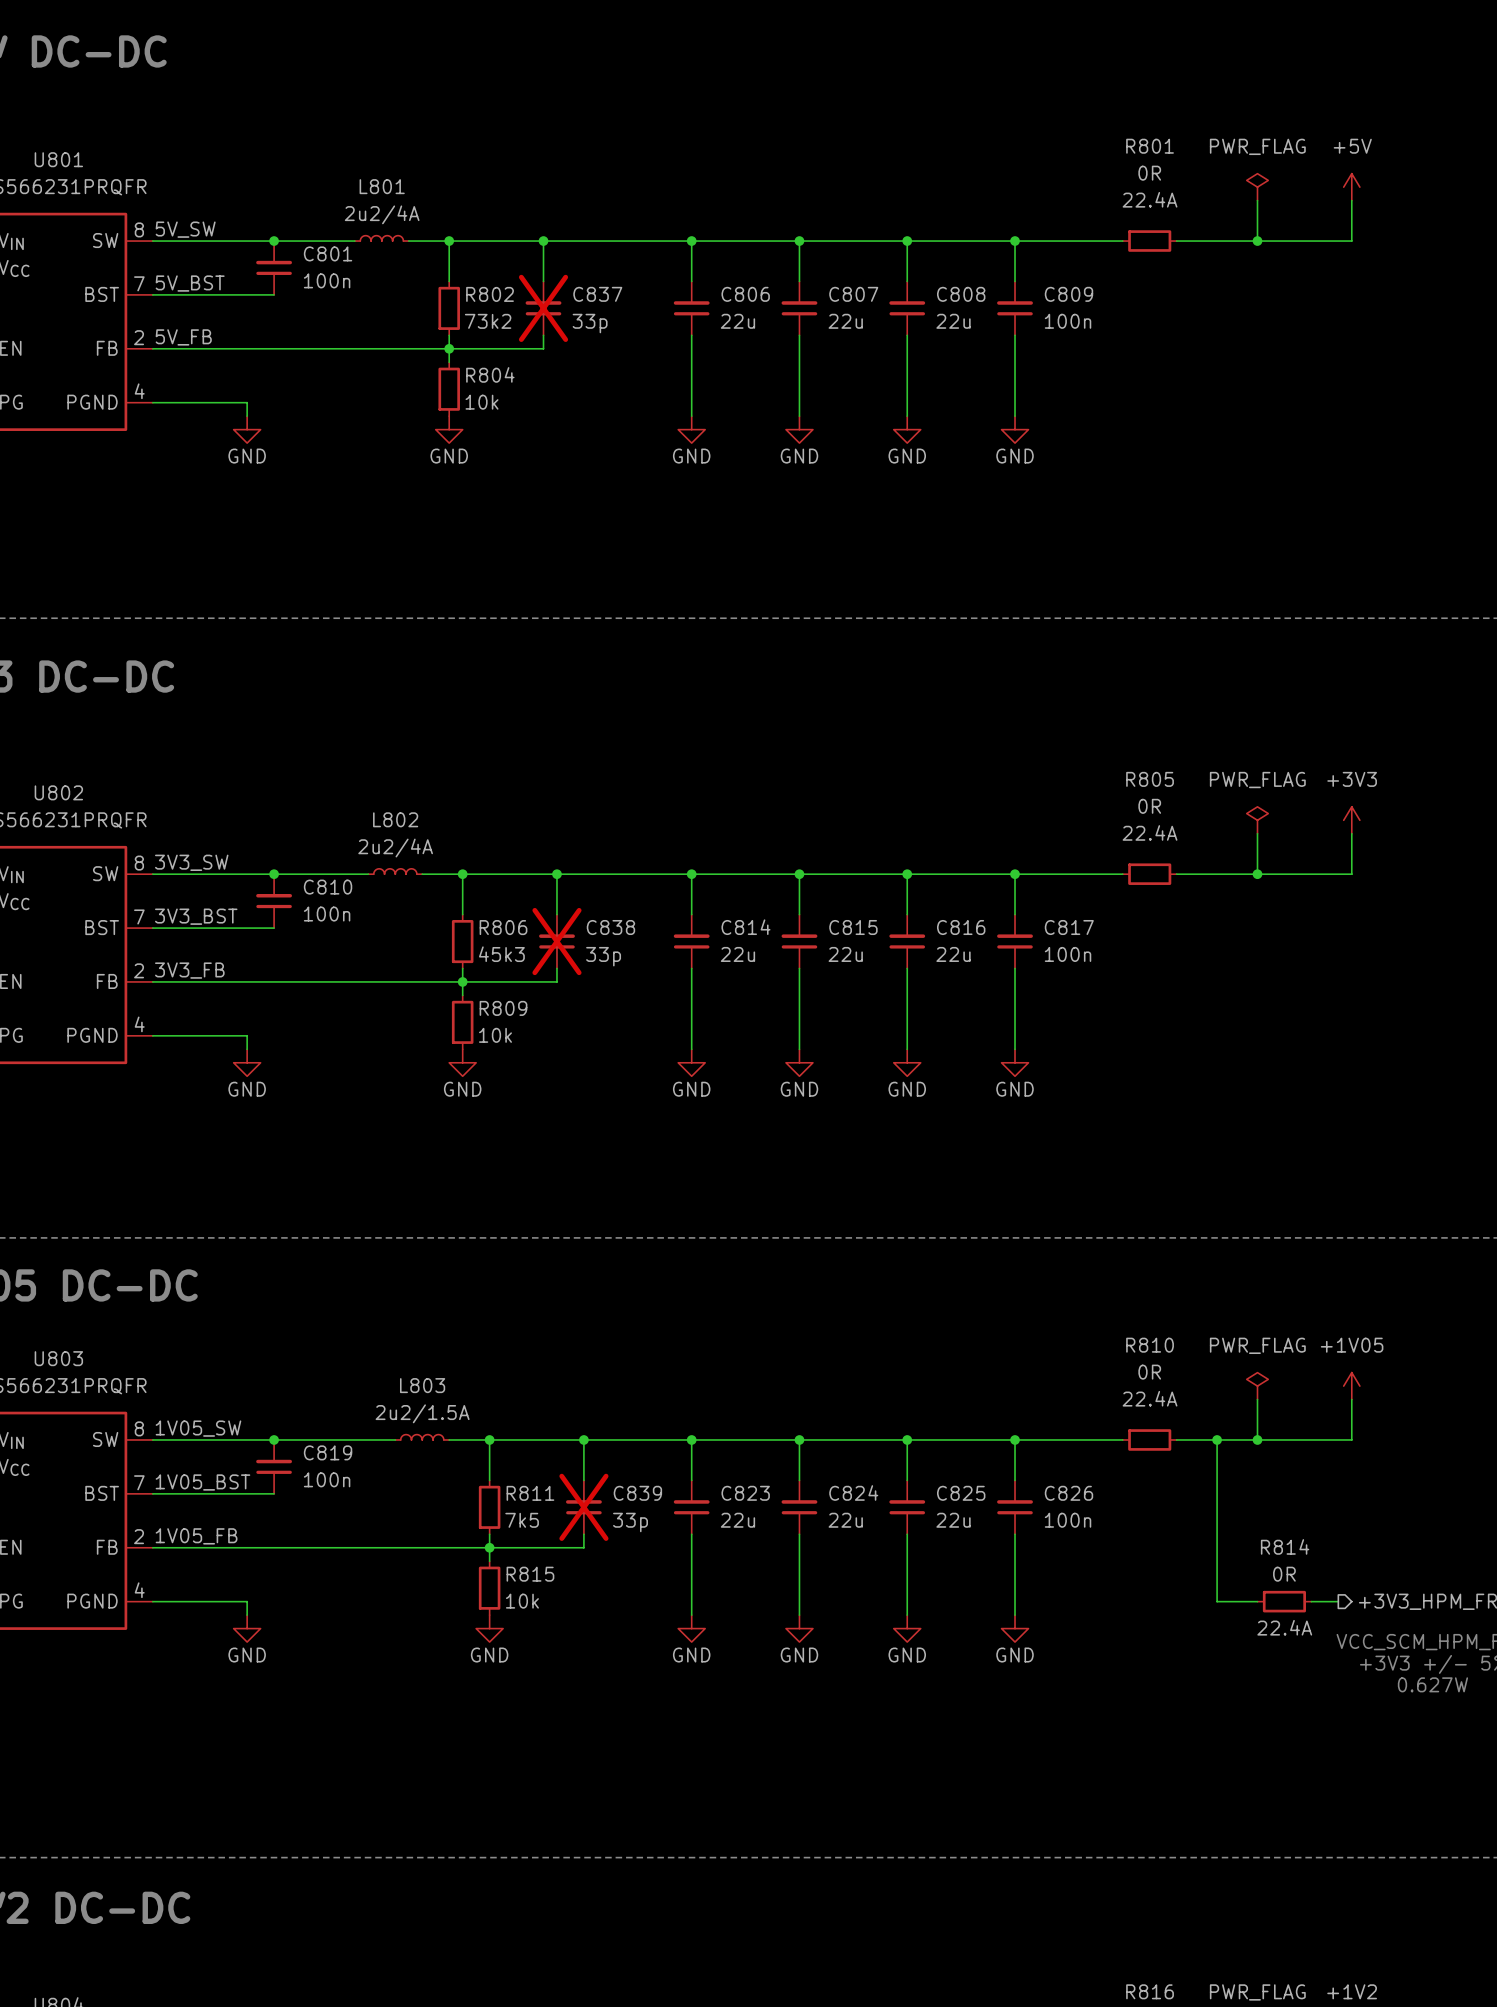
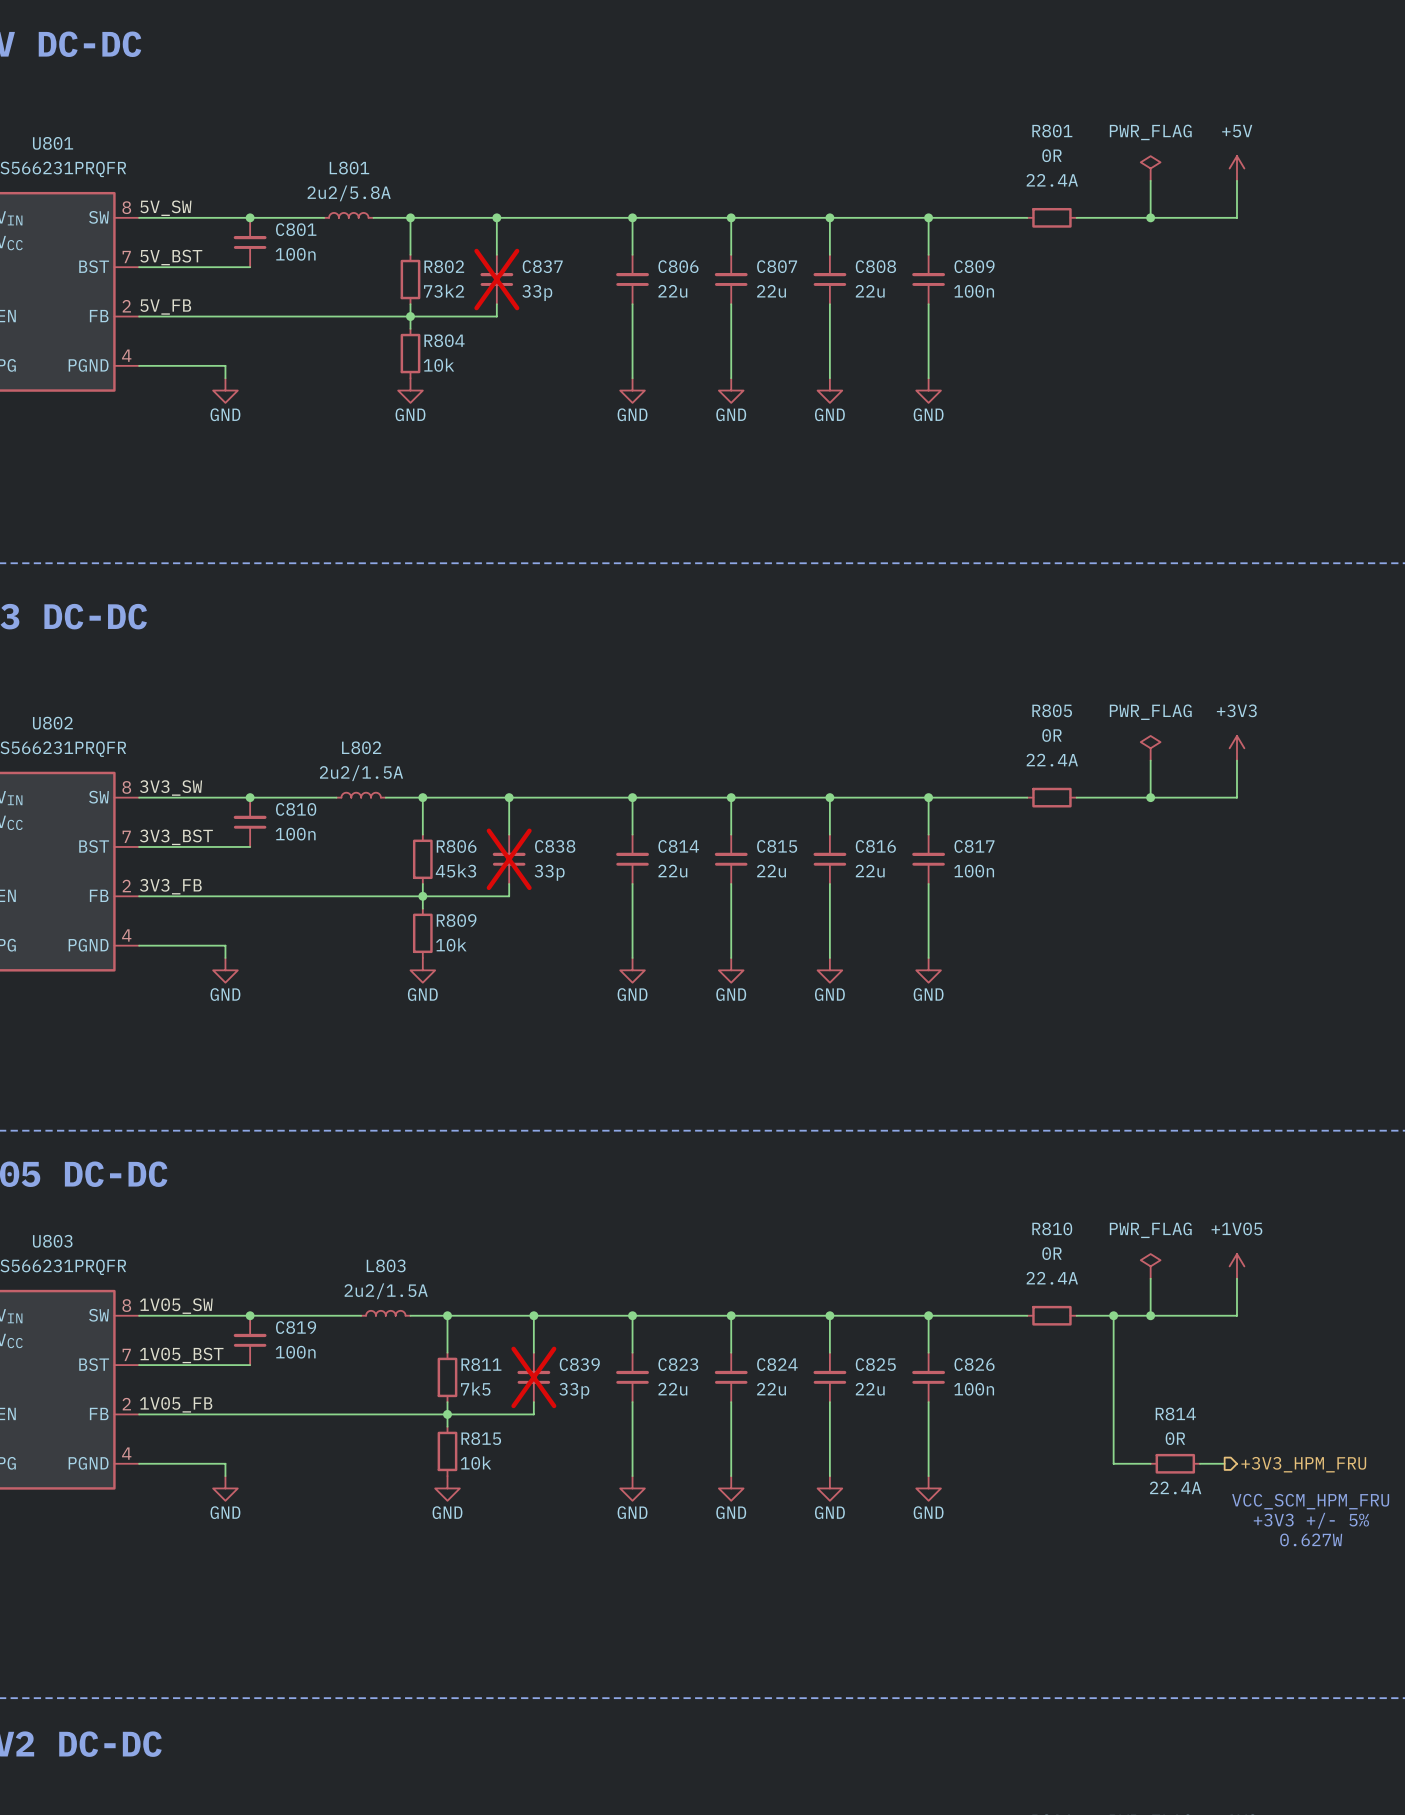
L801 text: 2u2/4A (382, 214) -> 2u2/5.8A (349, 193)
L802 text: 2u2/4A (395, 848) -> 2u2/1.5A (361, 773)

